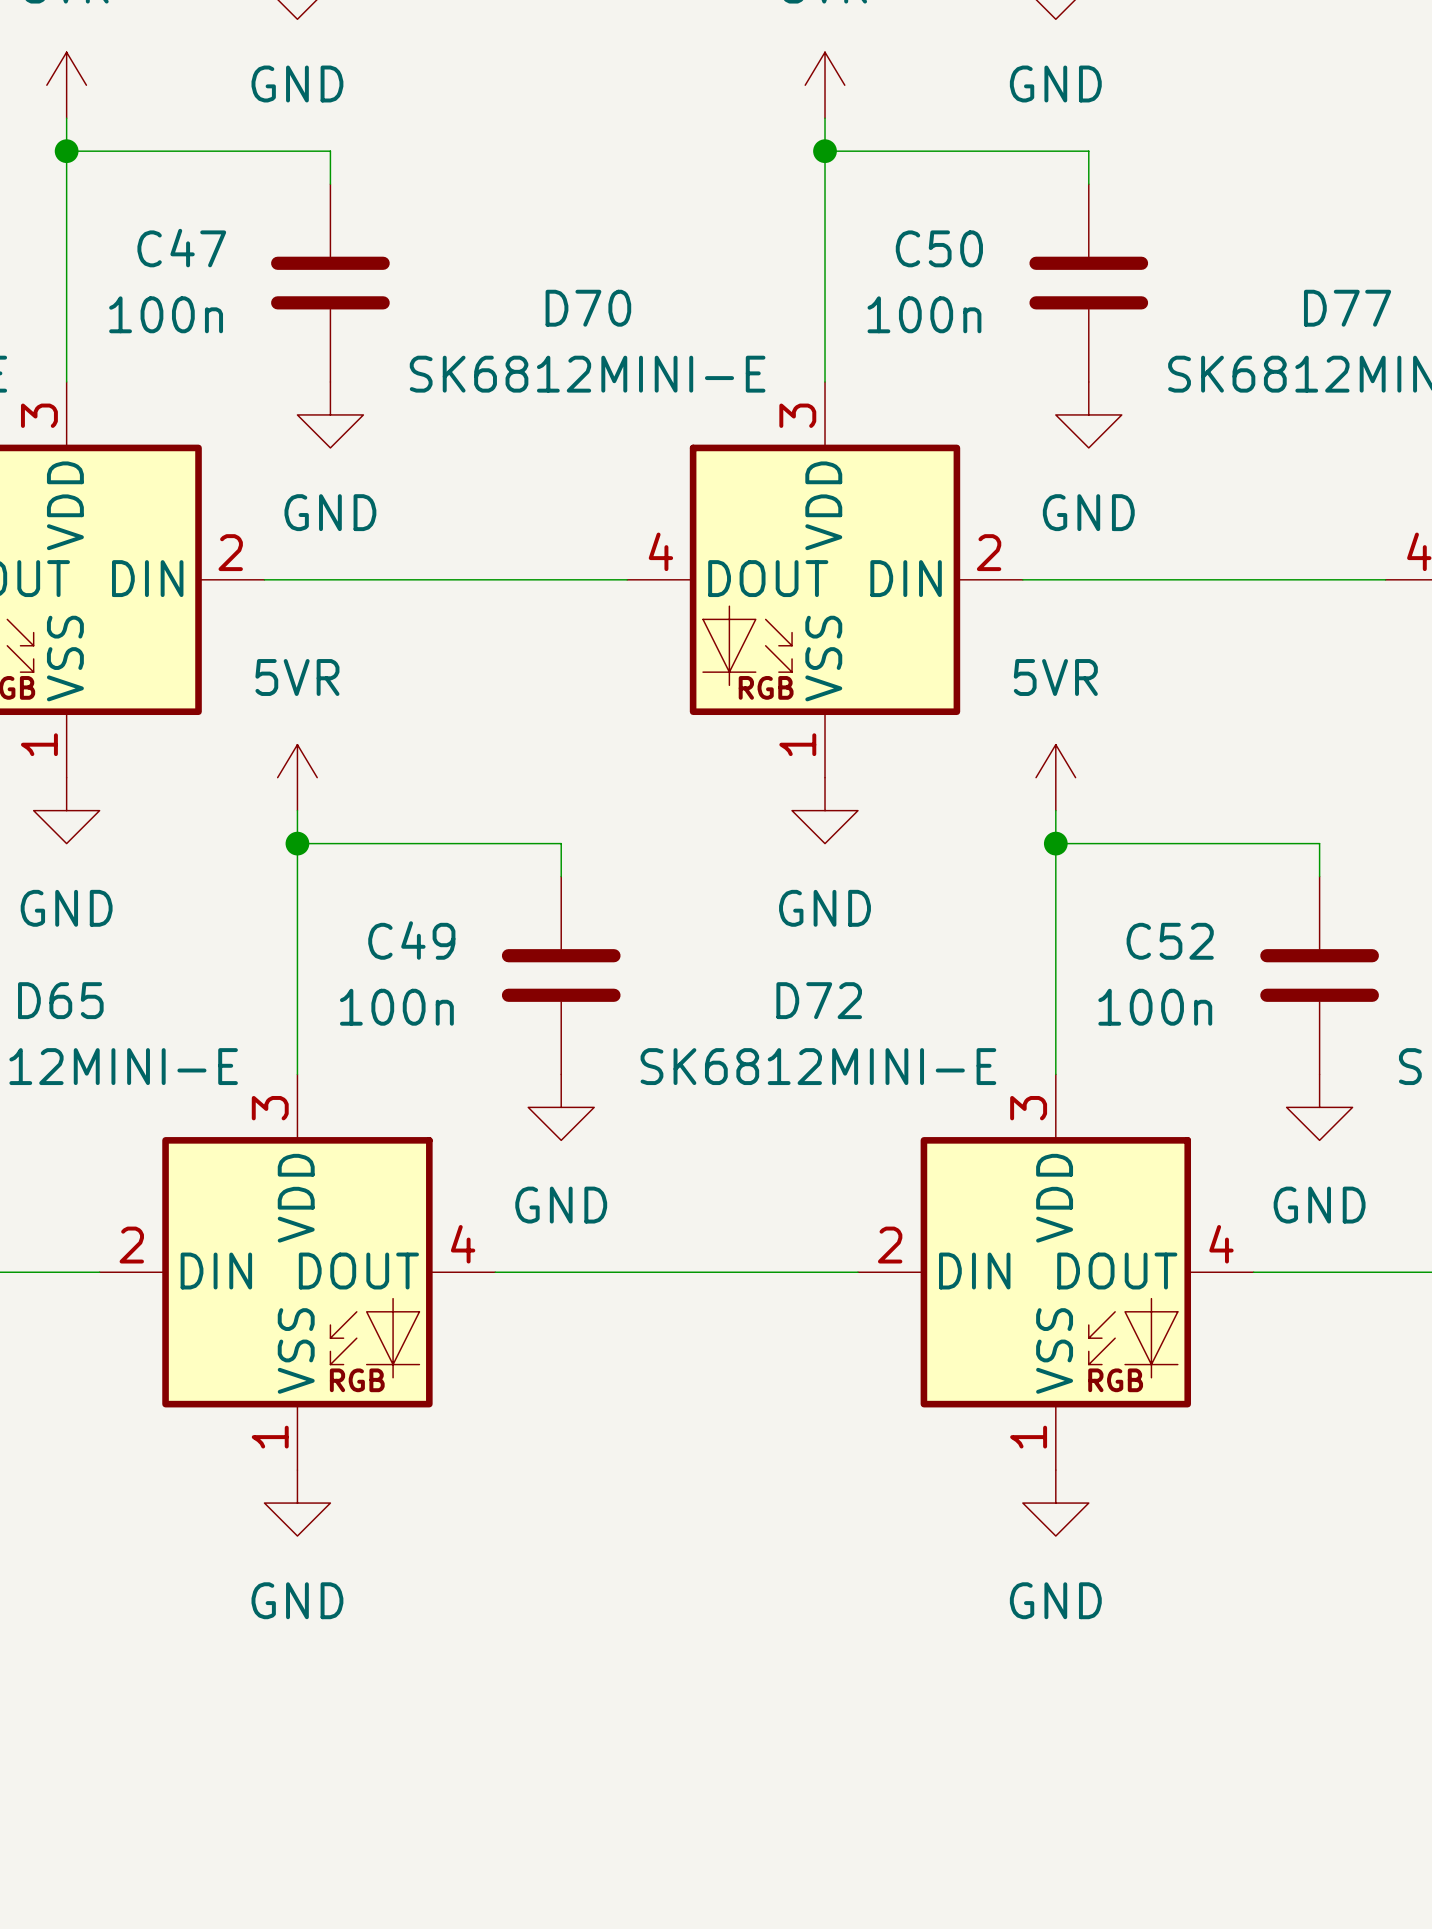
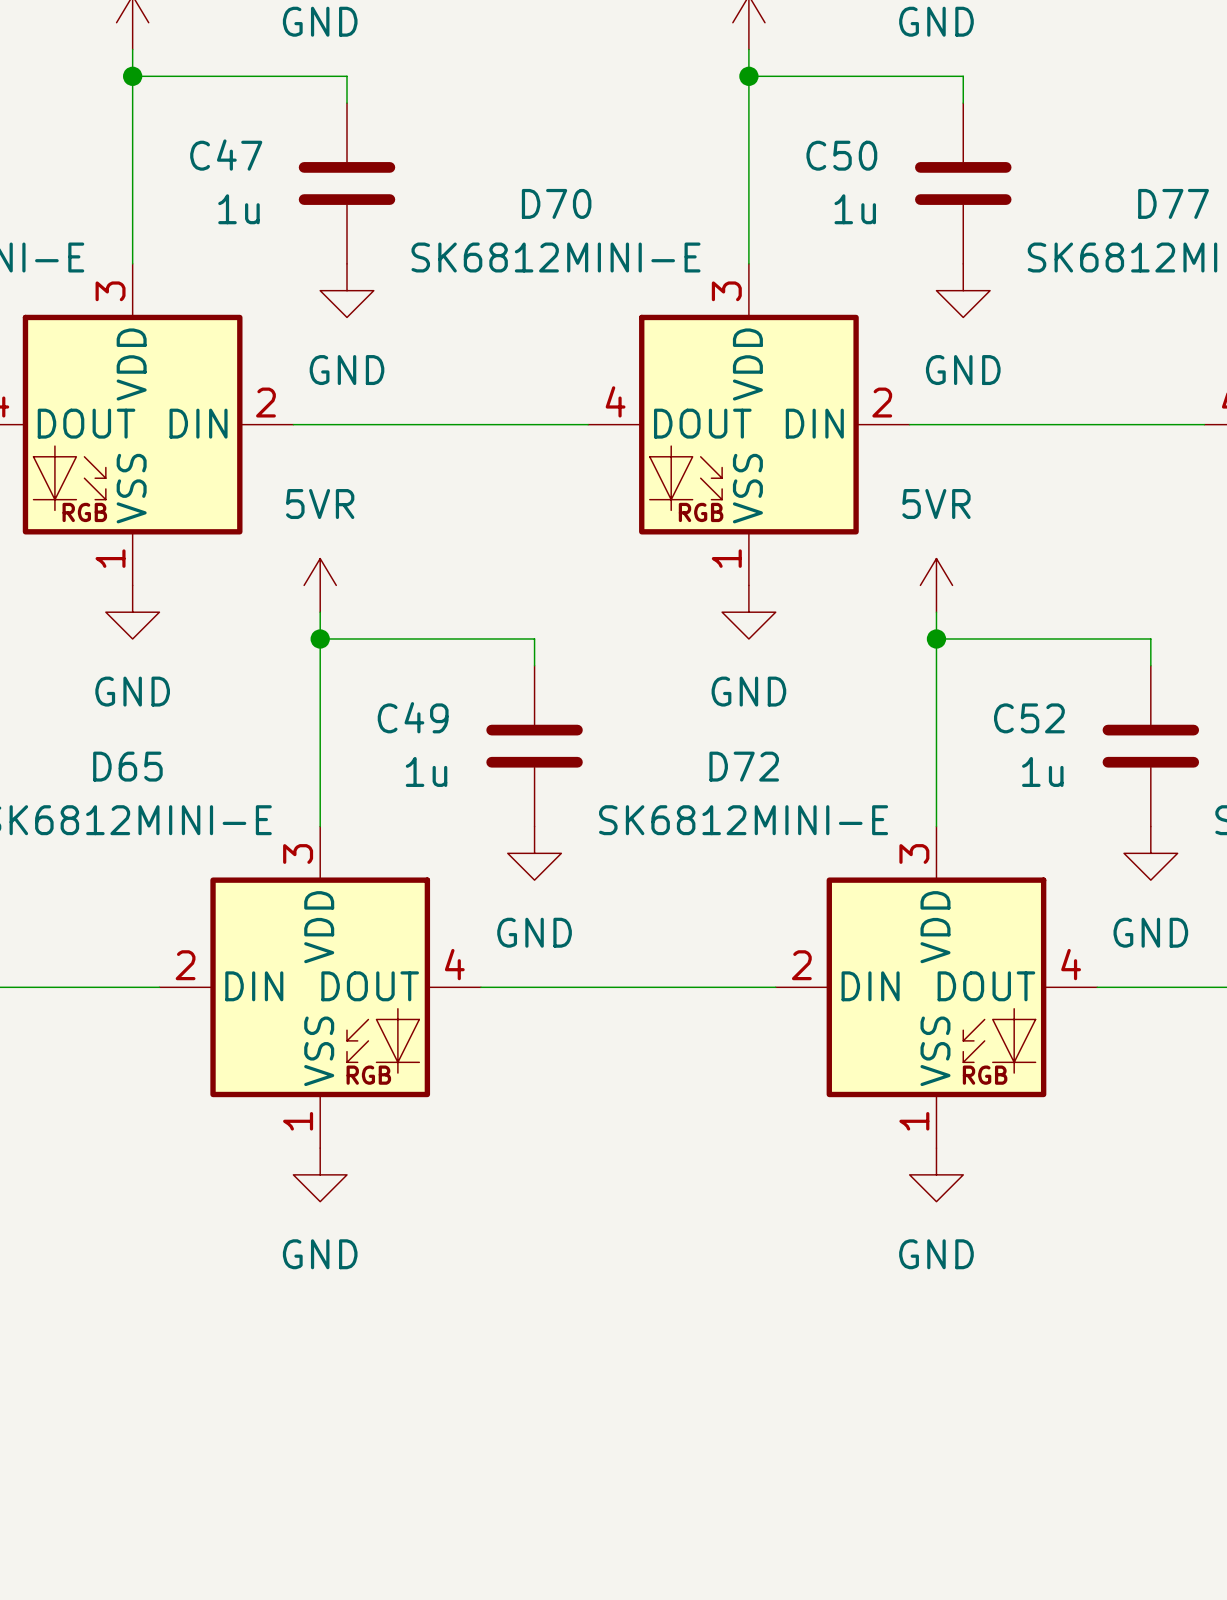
C47 value: 100n (166, 314) -> 1u (238, 209)
C50 value: 100n (924, 314) -> 1u (855, 209)
C49 value: 100n (396, 1007) -> 1u (426, 771)
C52 value: 100n (1155, 1007) -> 1u (1042, 771)

